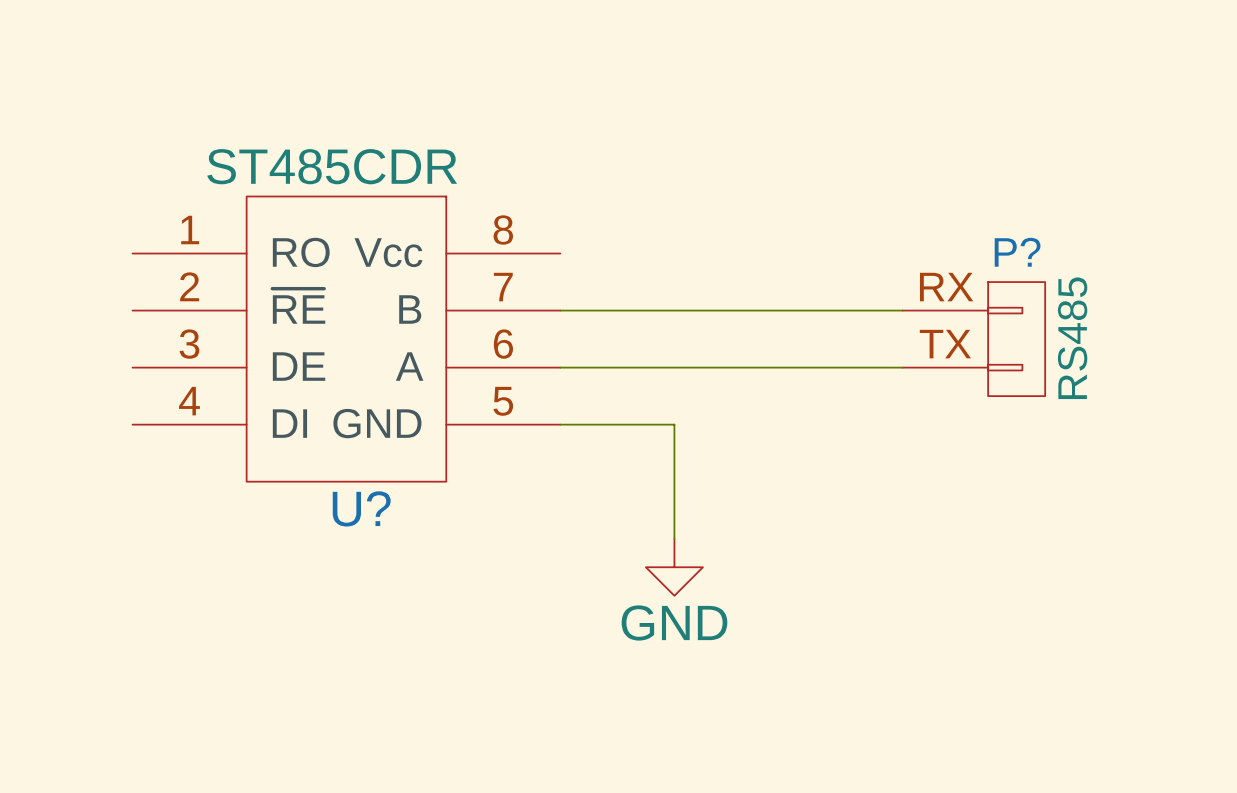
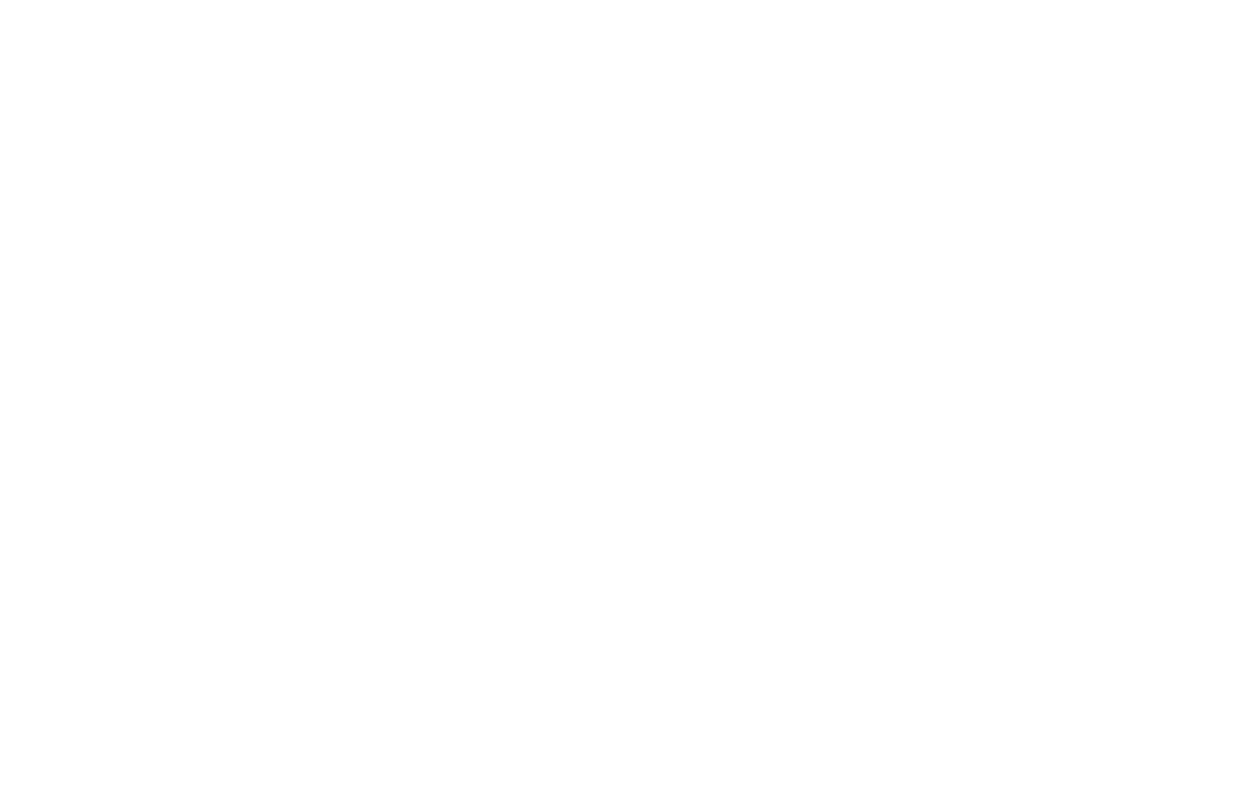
wire: (560, 310) (902, 310) -> none
U?: ST485CDR (346, 339) -> none
P?: RS485 (973, 339) -> none
wire: (560, 367) (902, 367) -> none
wire: (560, 424) (674, 424) (674, 538) -> none
power symbol: GND (674, 567) -> none

